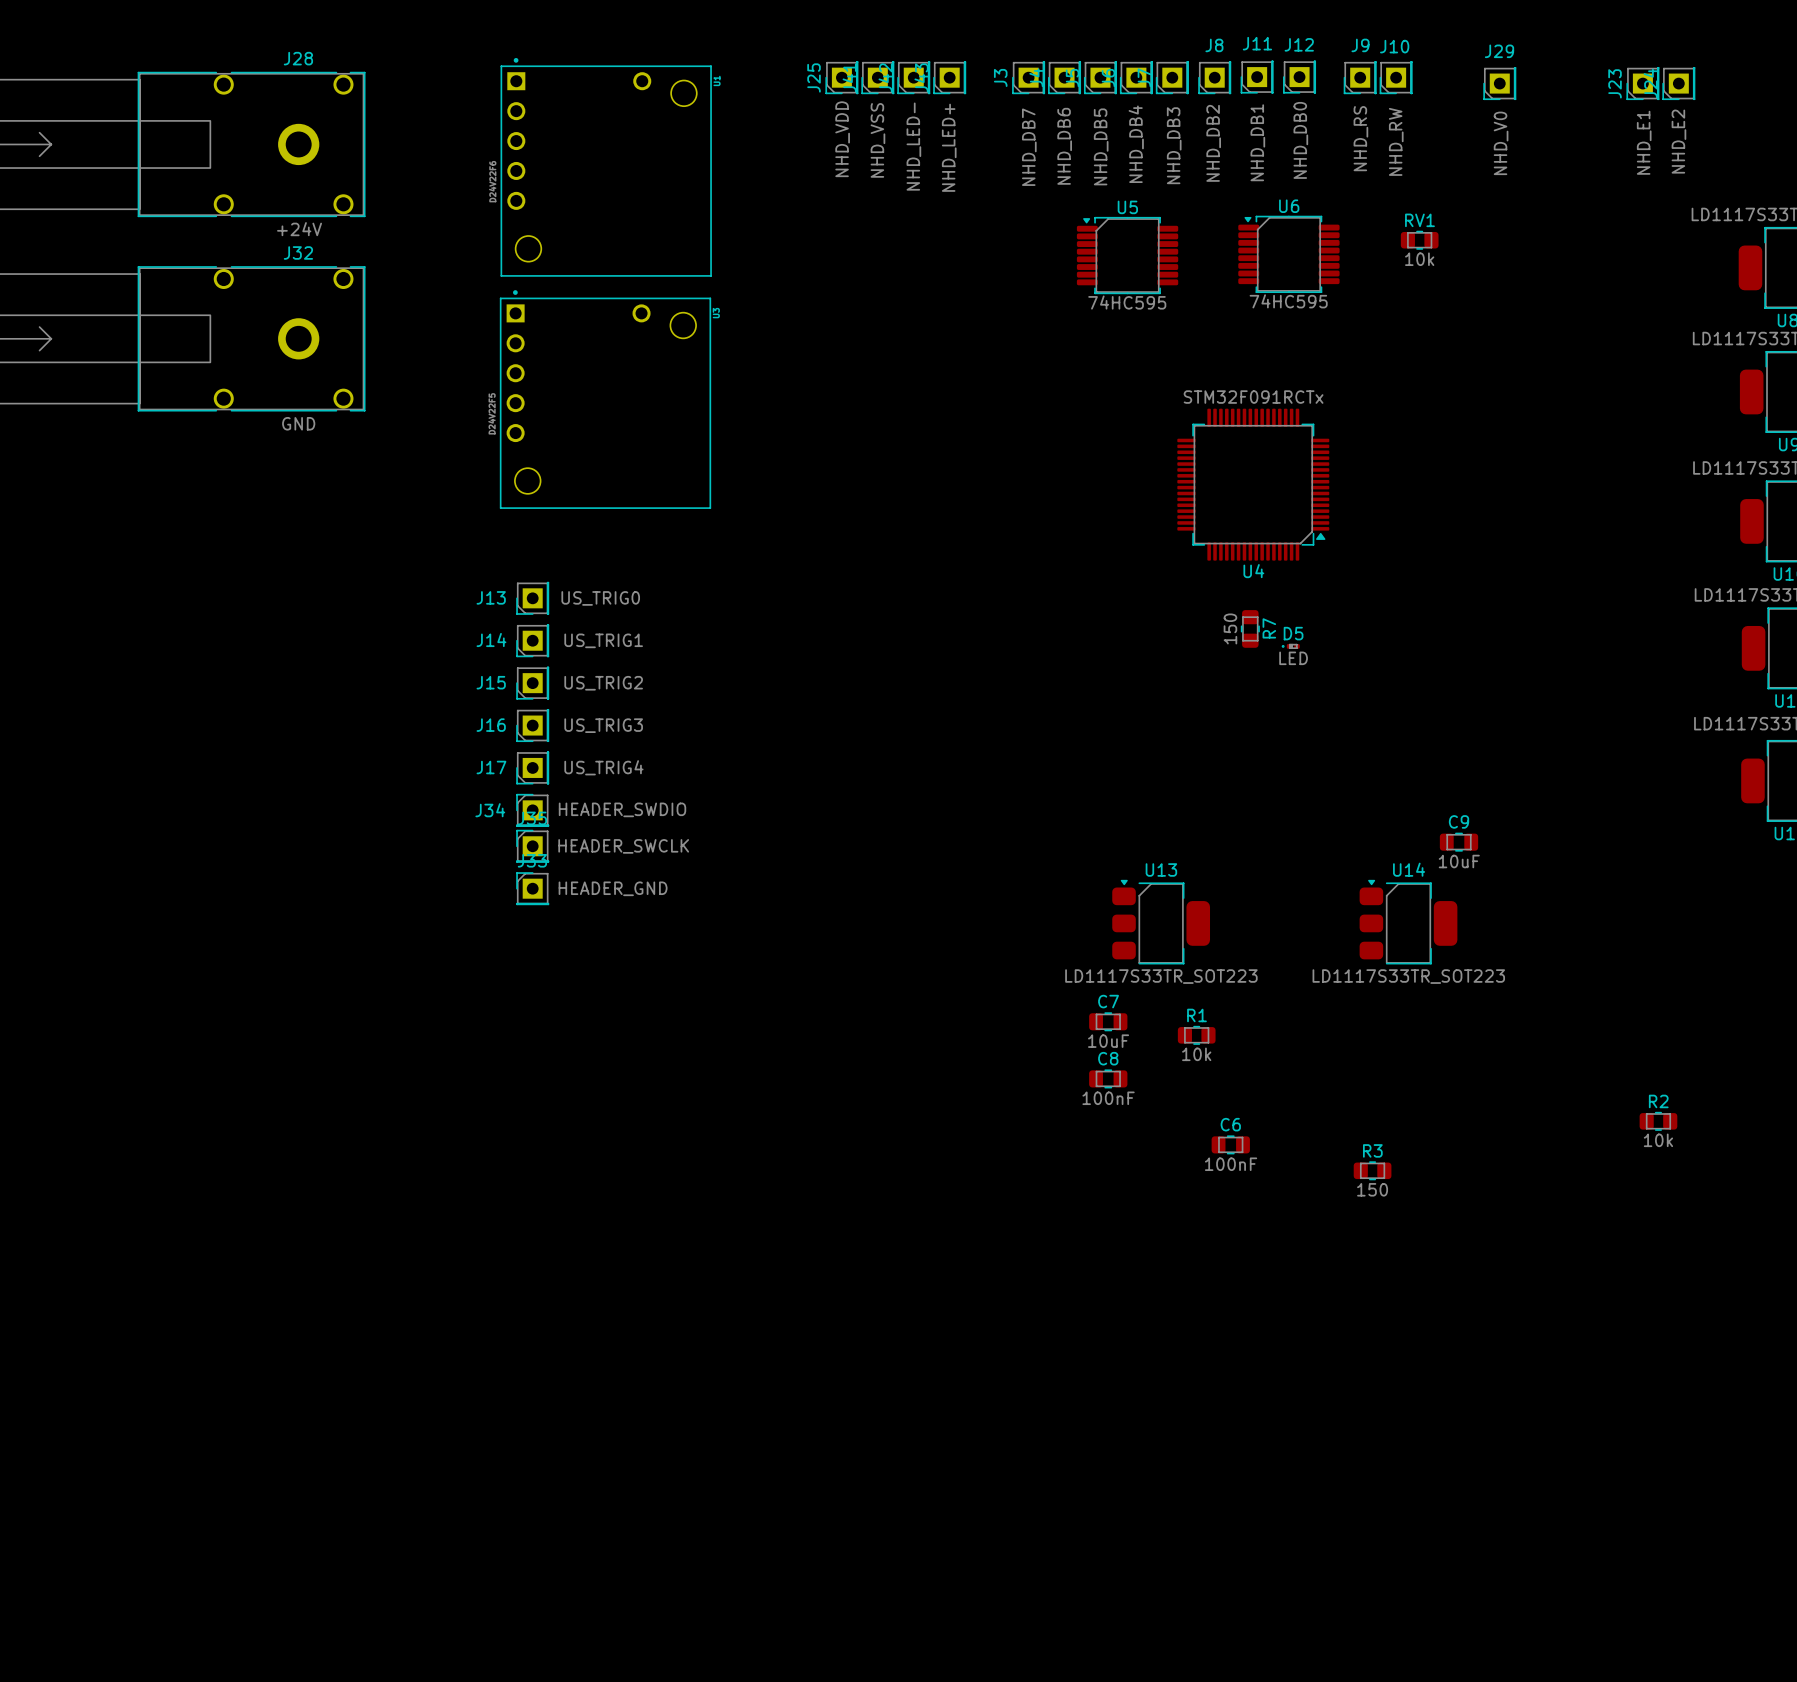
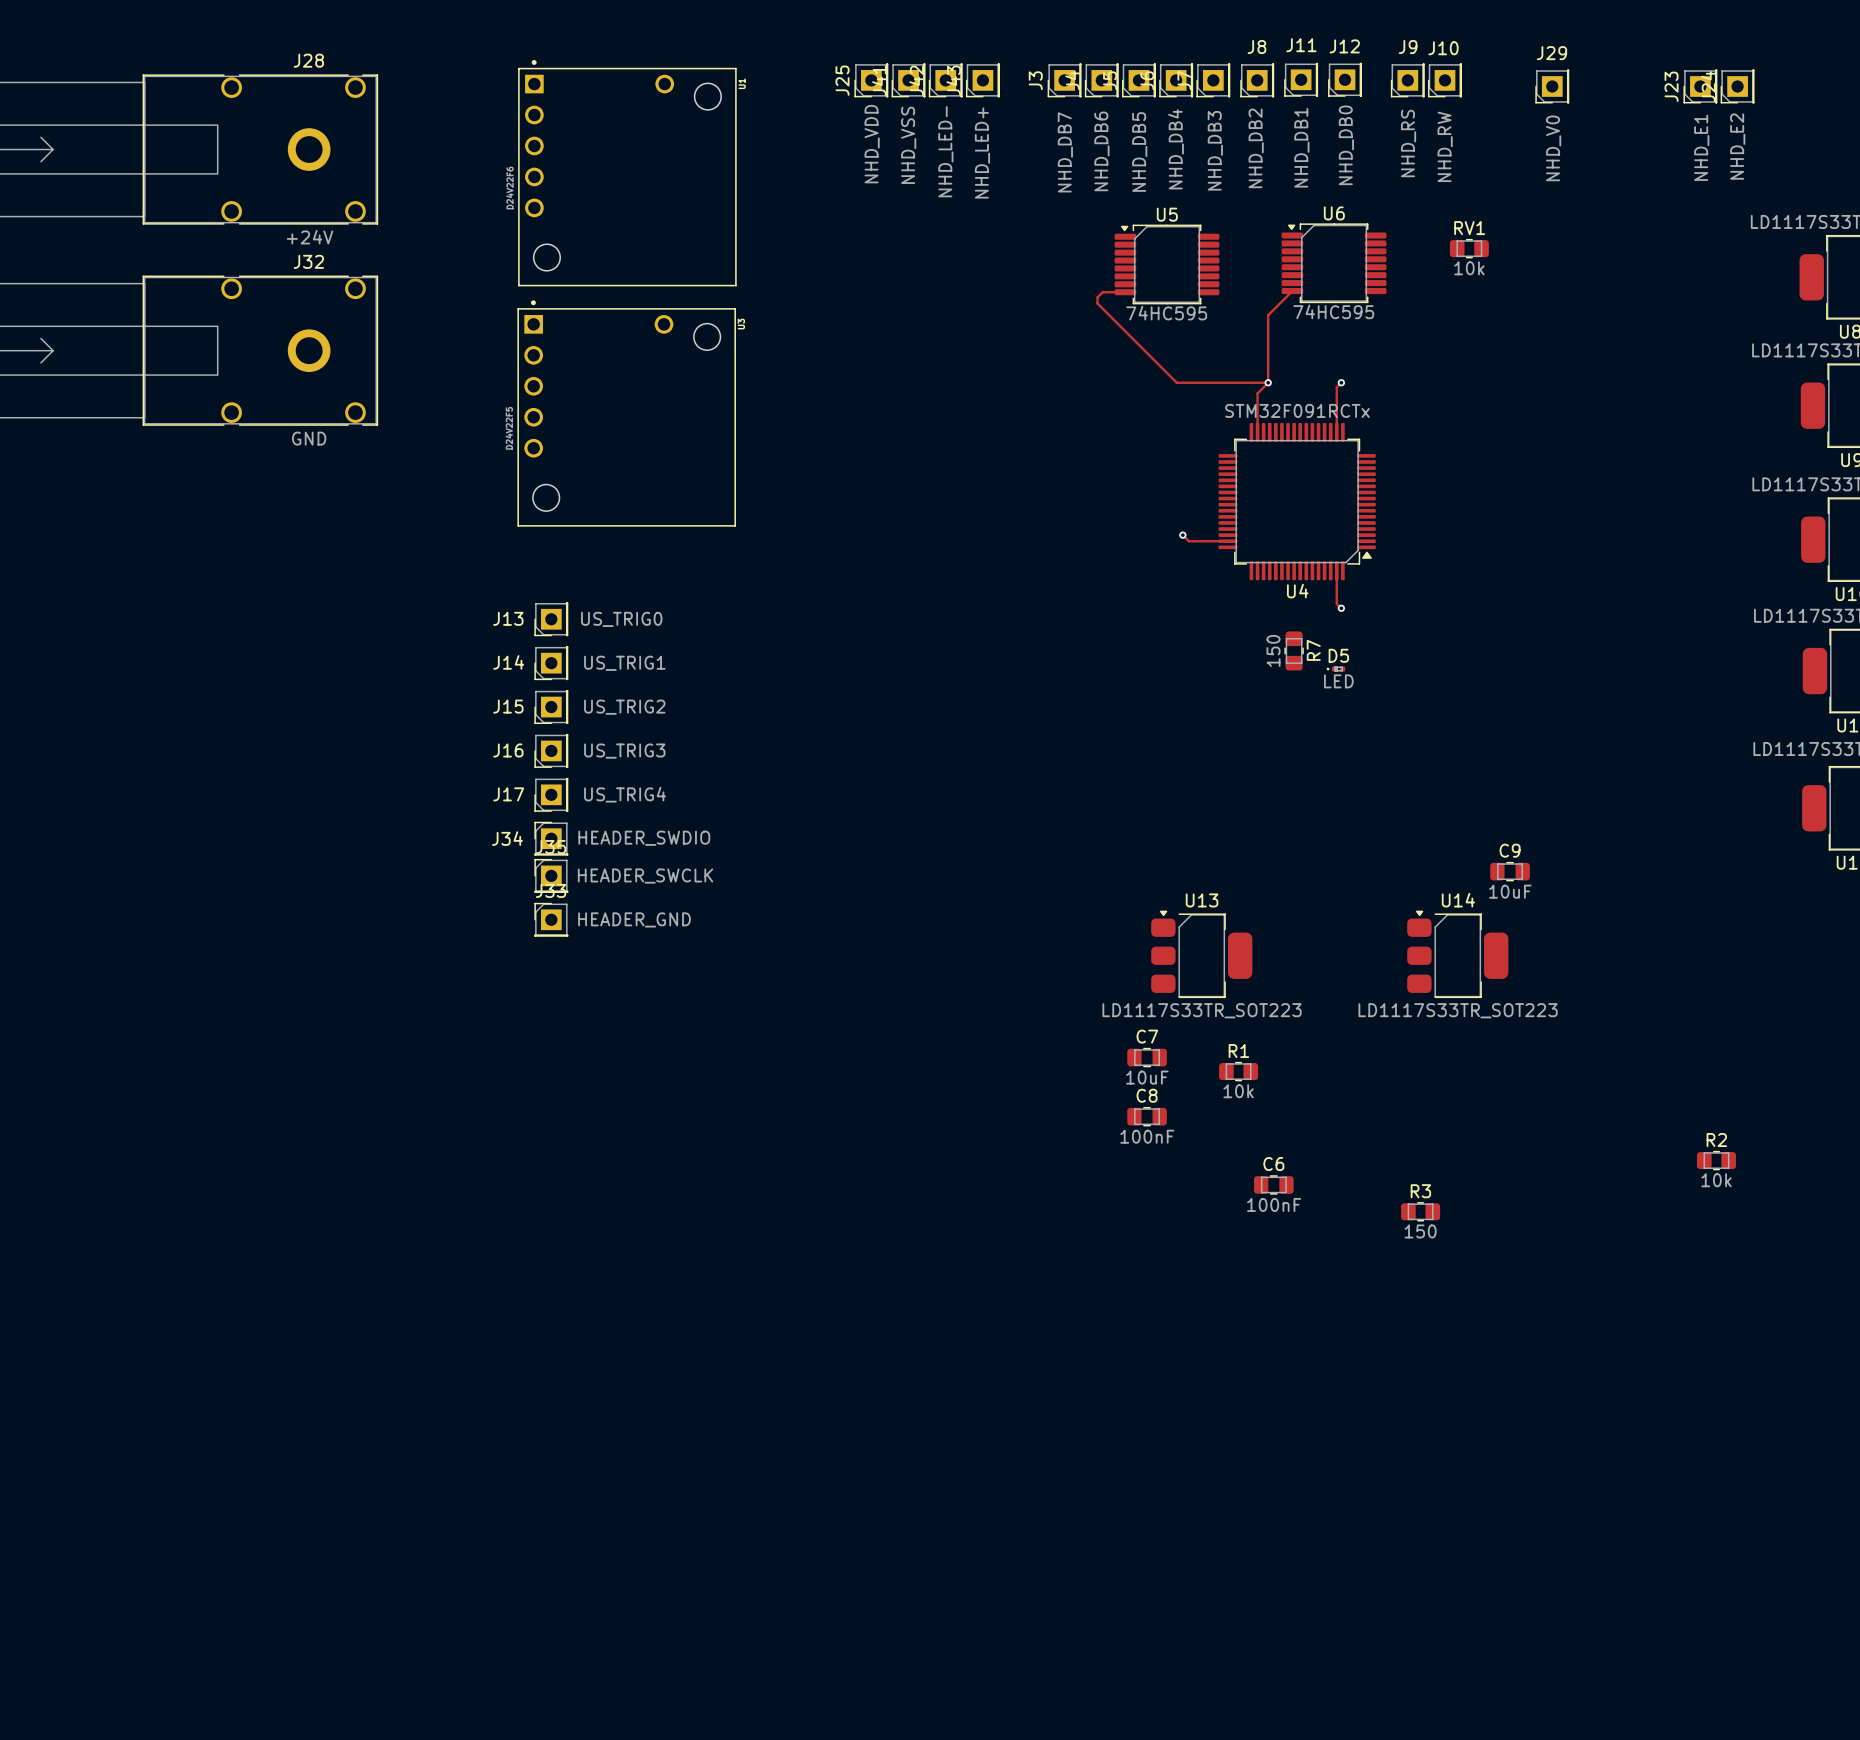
top track: none -> (1292, 291) (1268, 315) (1268, 382)
top track: none -> (1125, 292) (1102, 292) (1097, 297) (1097, 303) (1176, 382) (1268, 382)
top track: none -> (1268, 382) (1257, 393) (1257, 432)
via: none -> (1268, 382)
top track: none -> (1341, 382) (1336, 387) (1336, 432)
via: none -> (1341, 382)
top track: none -> (1182, 535) (1188, 541) (1227, 541)
via: none -> (1182, 535)
top track: none -> (1336, 570) (1336, 603) (1341, 608)
via: none -> (1341, 608)

